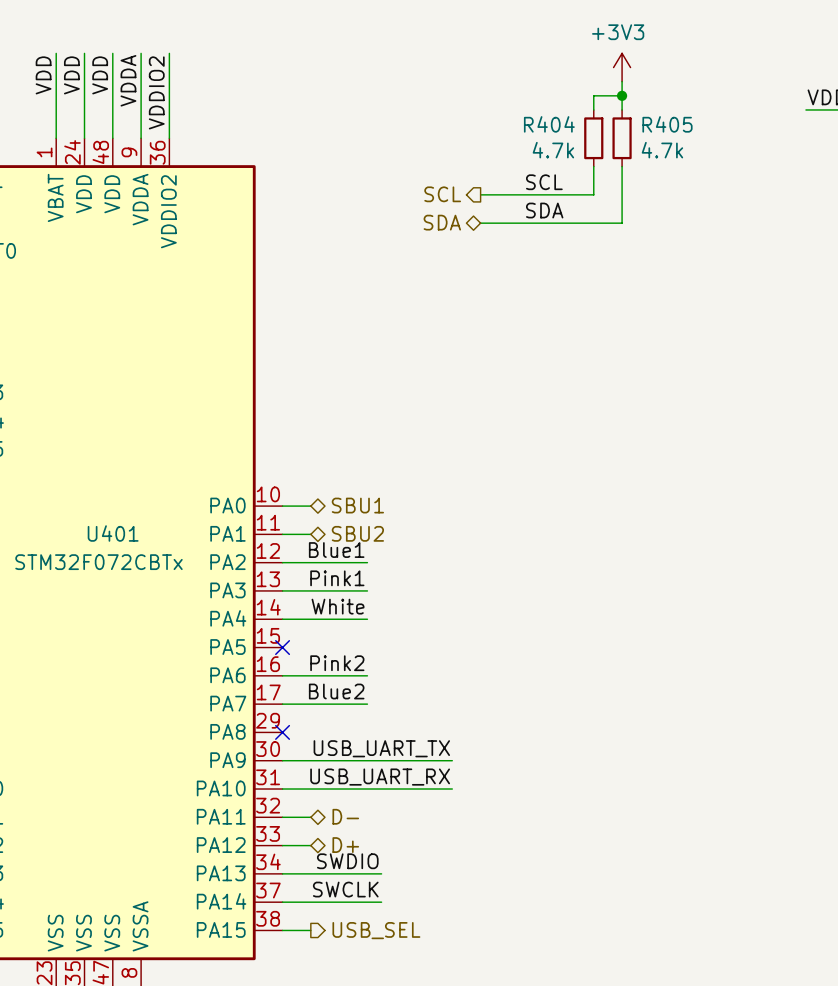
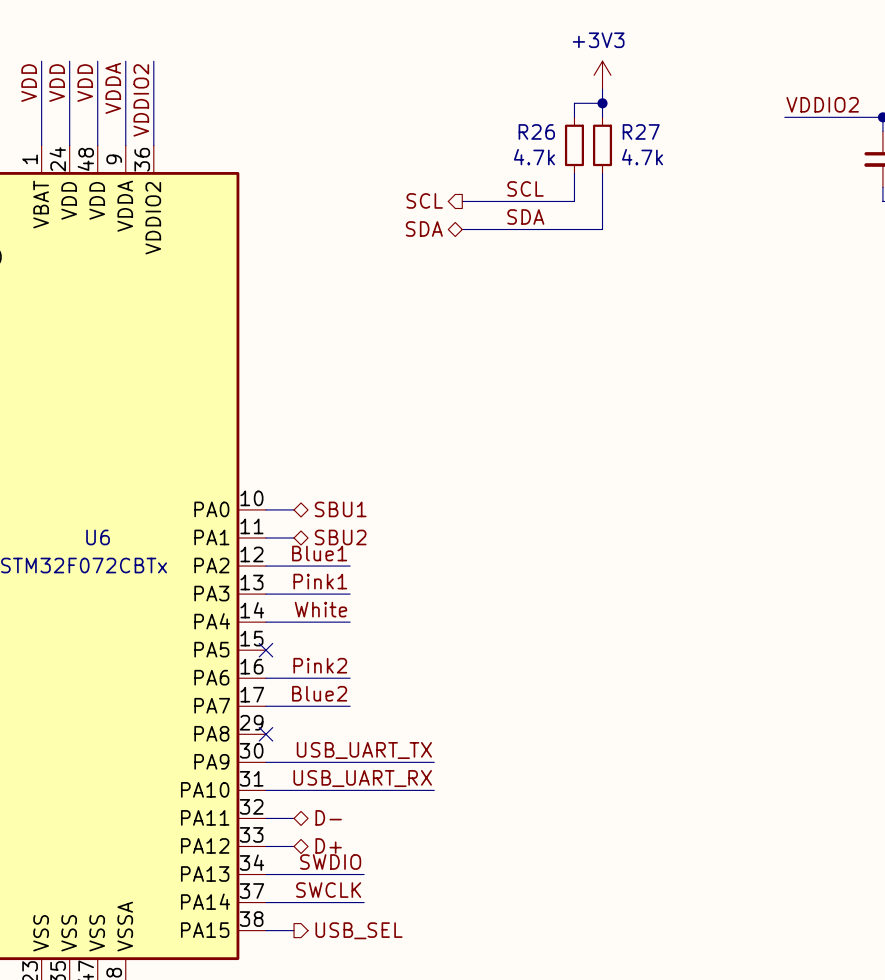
R404 name: R404 (549, 124) -> R26 (536, 131)
R405 name: R405 (667, 124) -> R27 (641, 131)
U401 name: U401 (113, 533) -> U6 (98, 537)

